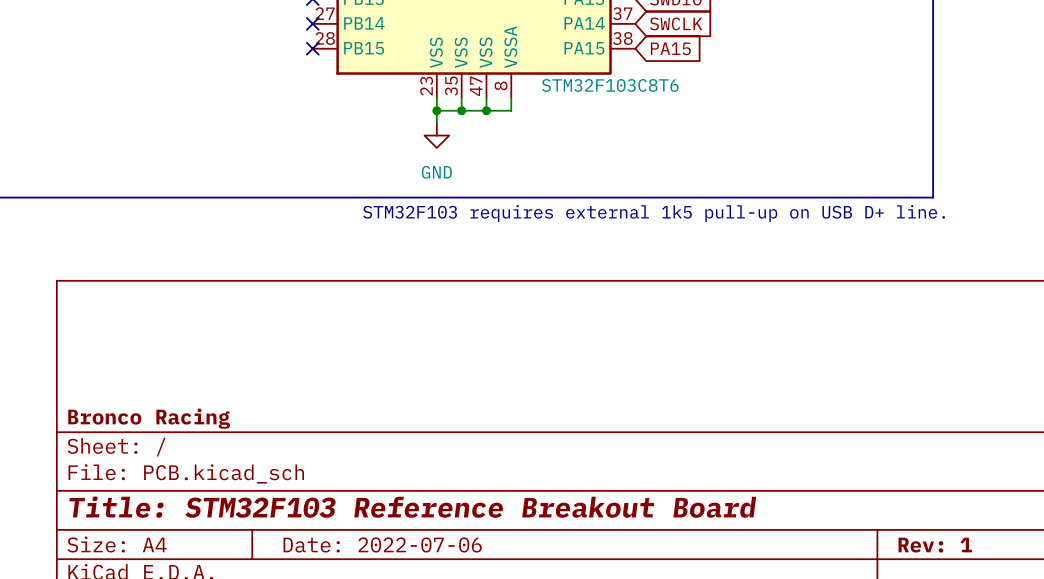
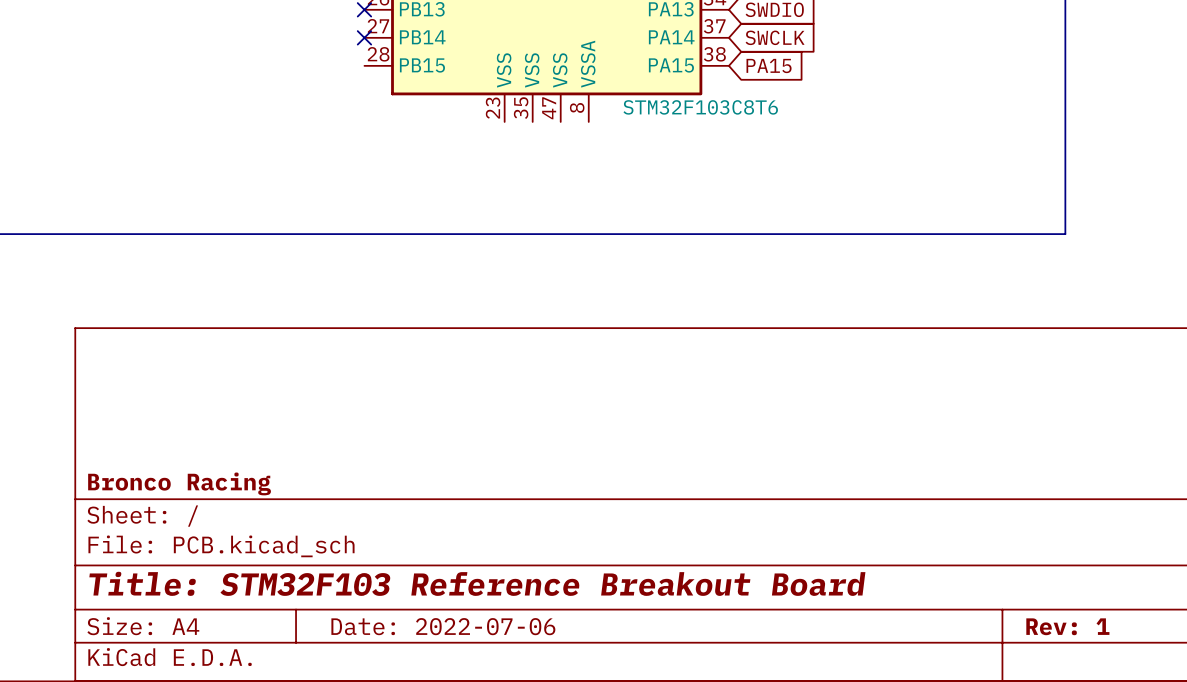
no-connect mark: (312, 48) -> none
wire: (436, 98) (436, 123) -> none
wire: (461, 98) (461, 110) -> none
wire: (486, 98) (486, 110) -> none
wire: (511, 98) (511, 110) (436, 110) -> none
junction: (436, 110) -> none
junction: (461, 110) -> none
junction: (486, 110) -> none
power symbol: GND (436, 135) -> none
text: STM32F103 requires external 1k5 pull-up on USB D+ line. (654, 213) -> none

